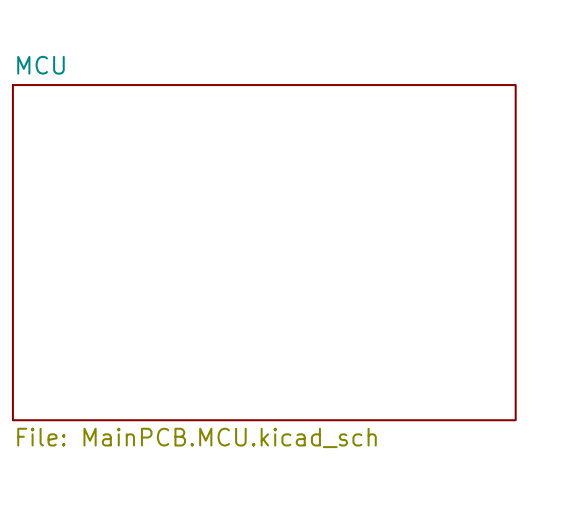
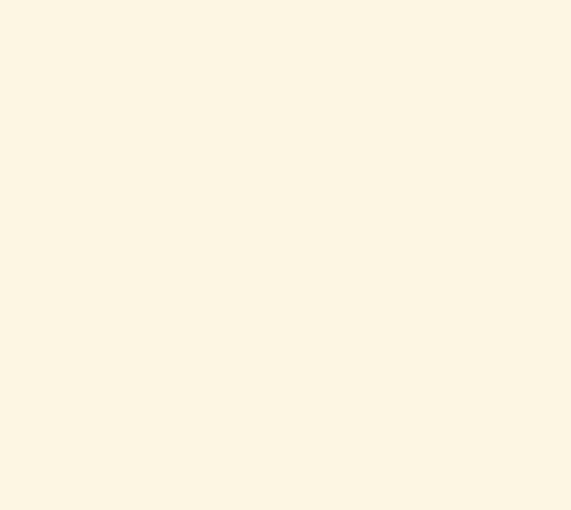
sheet MCU: File: MainPCB.MCU.kicad_sch (264, 252) -> none

